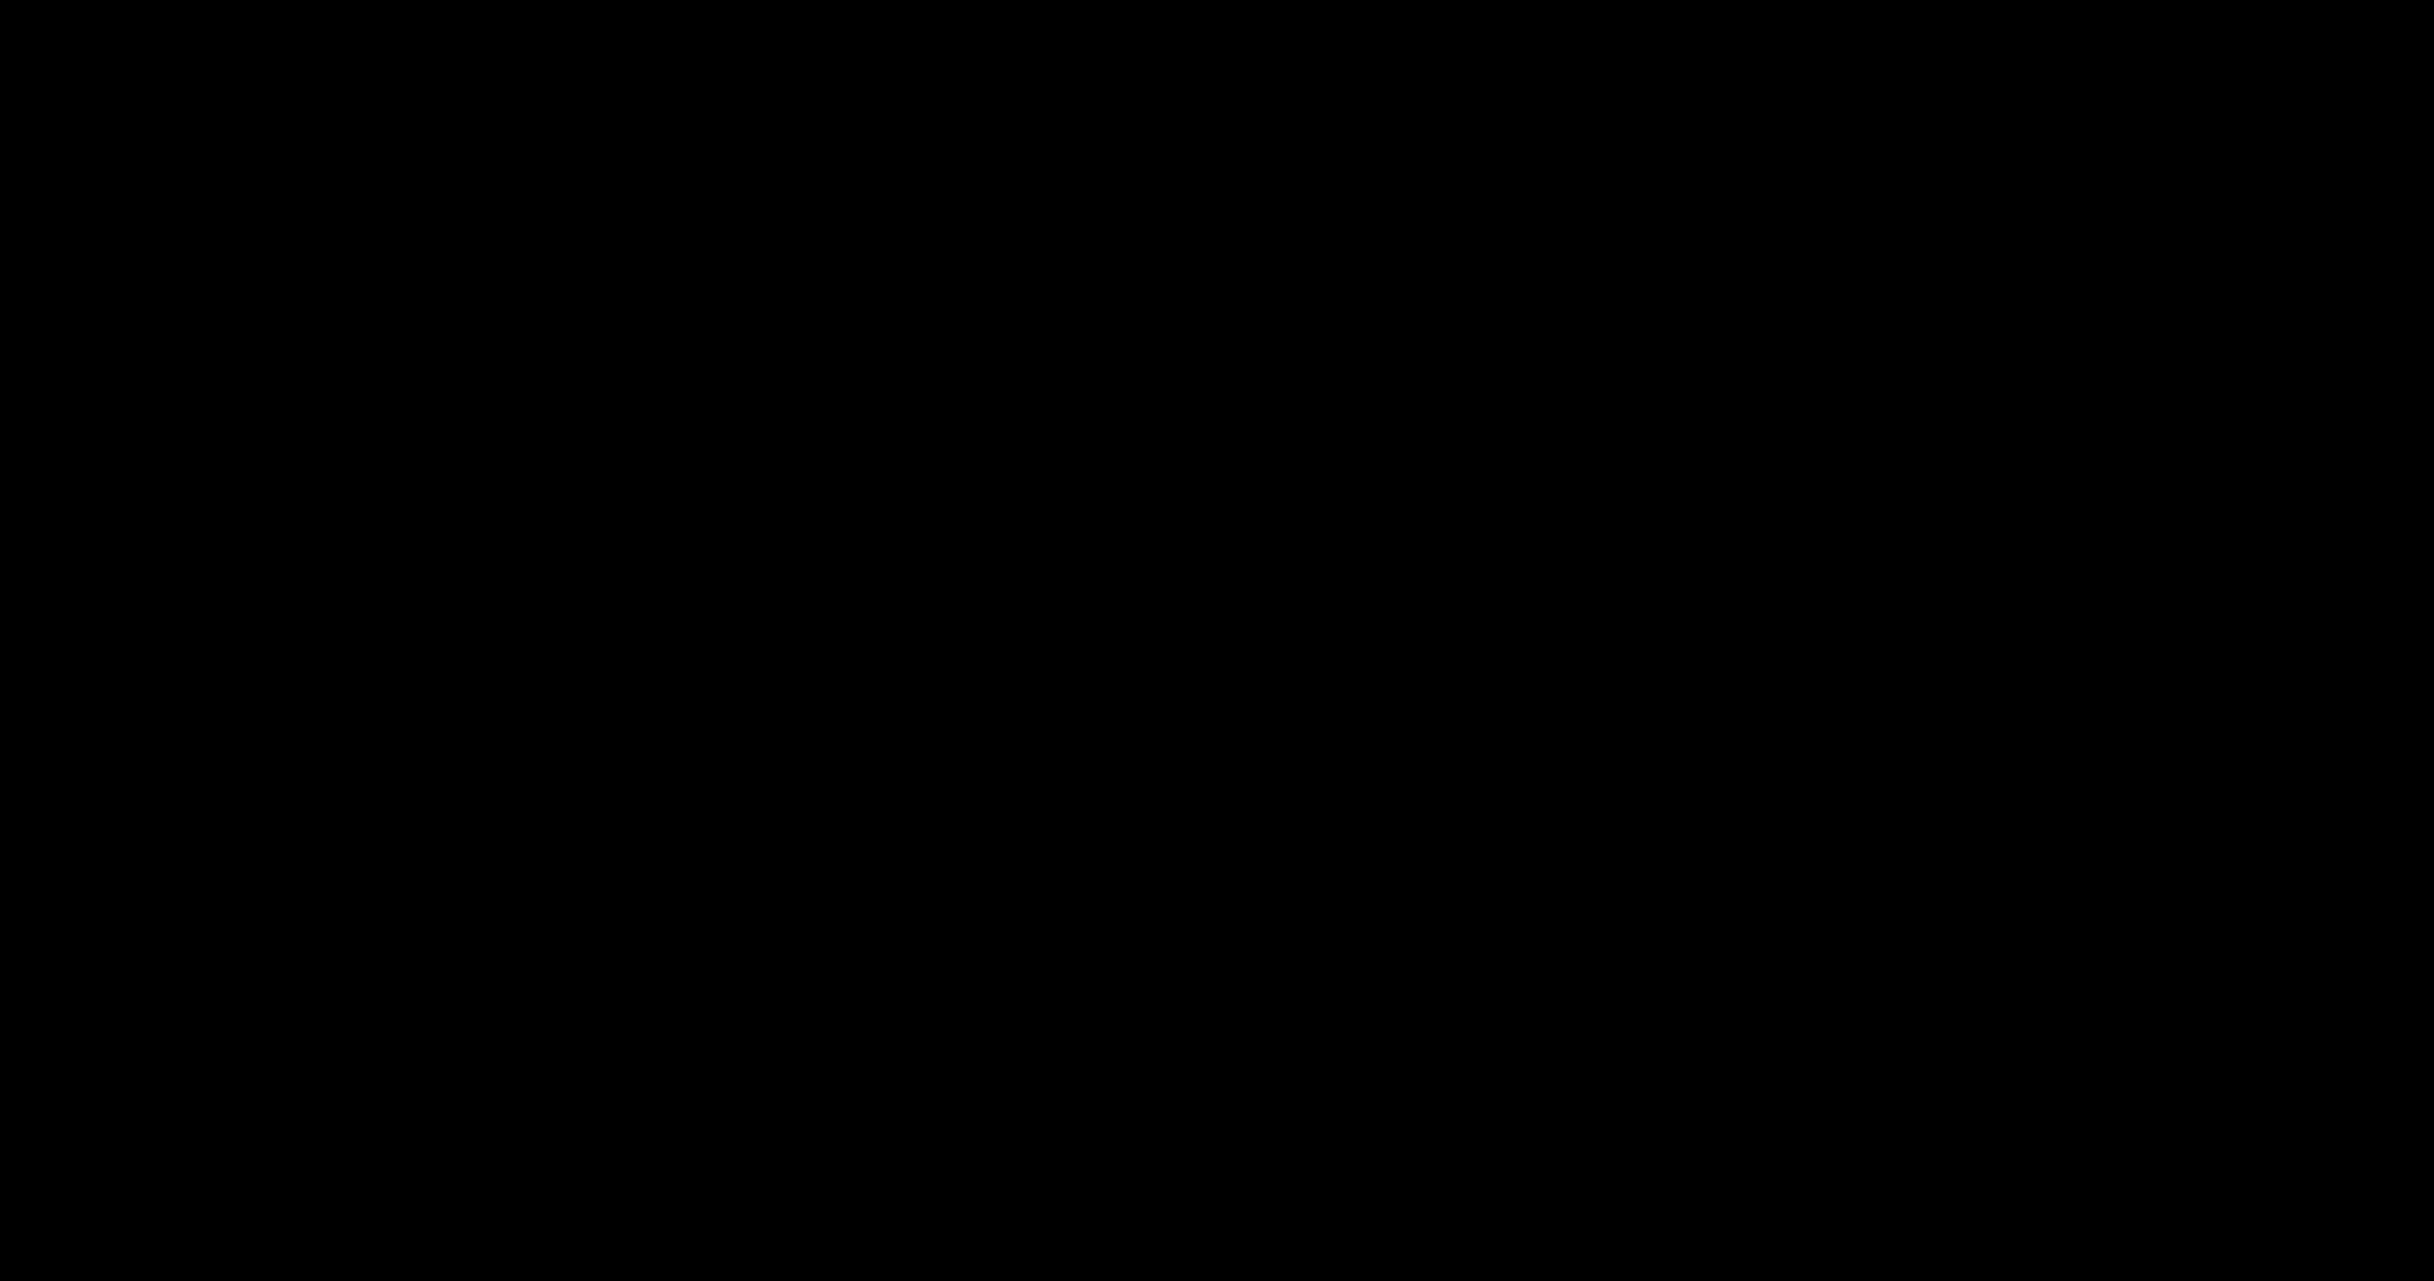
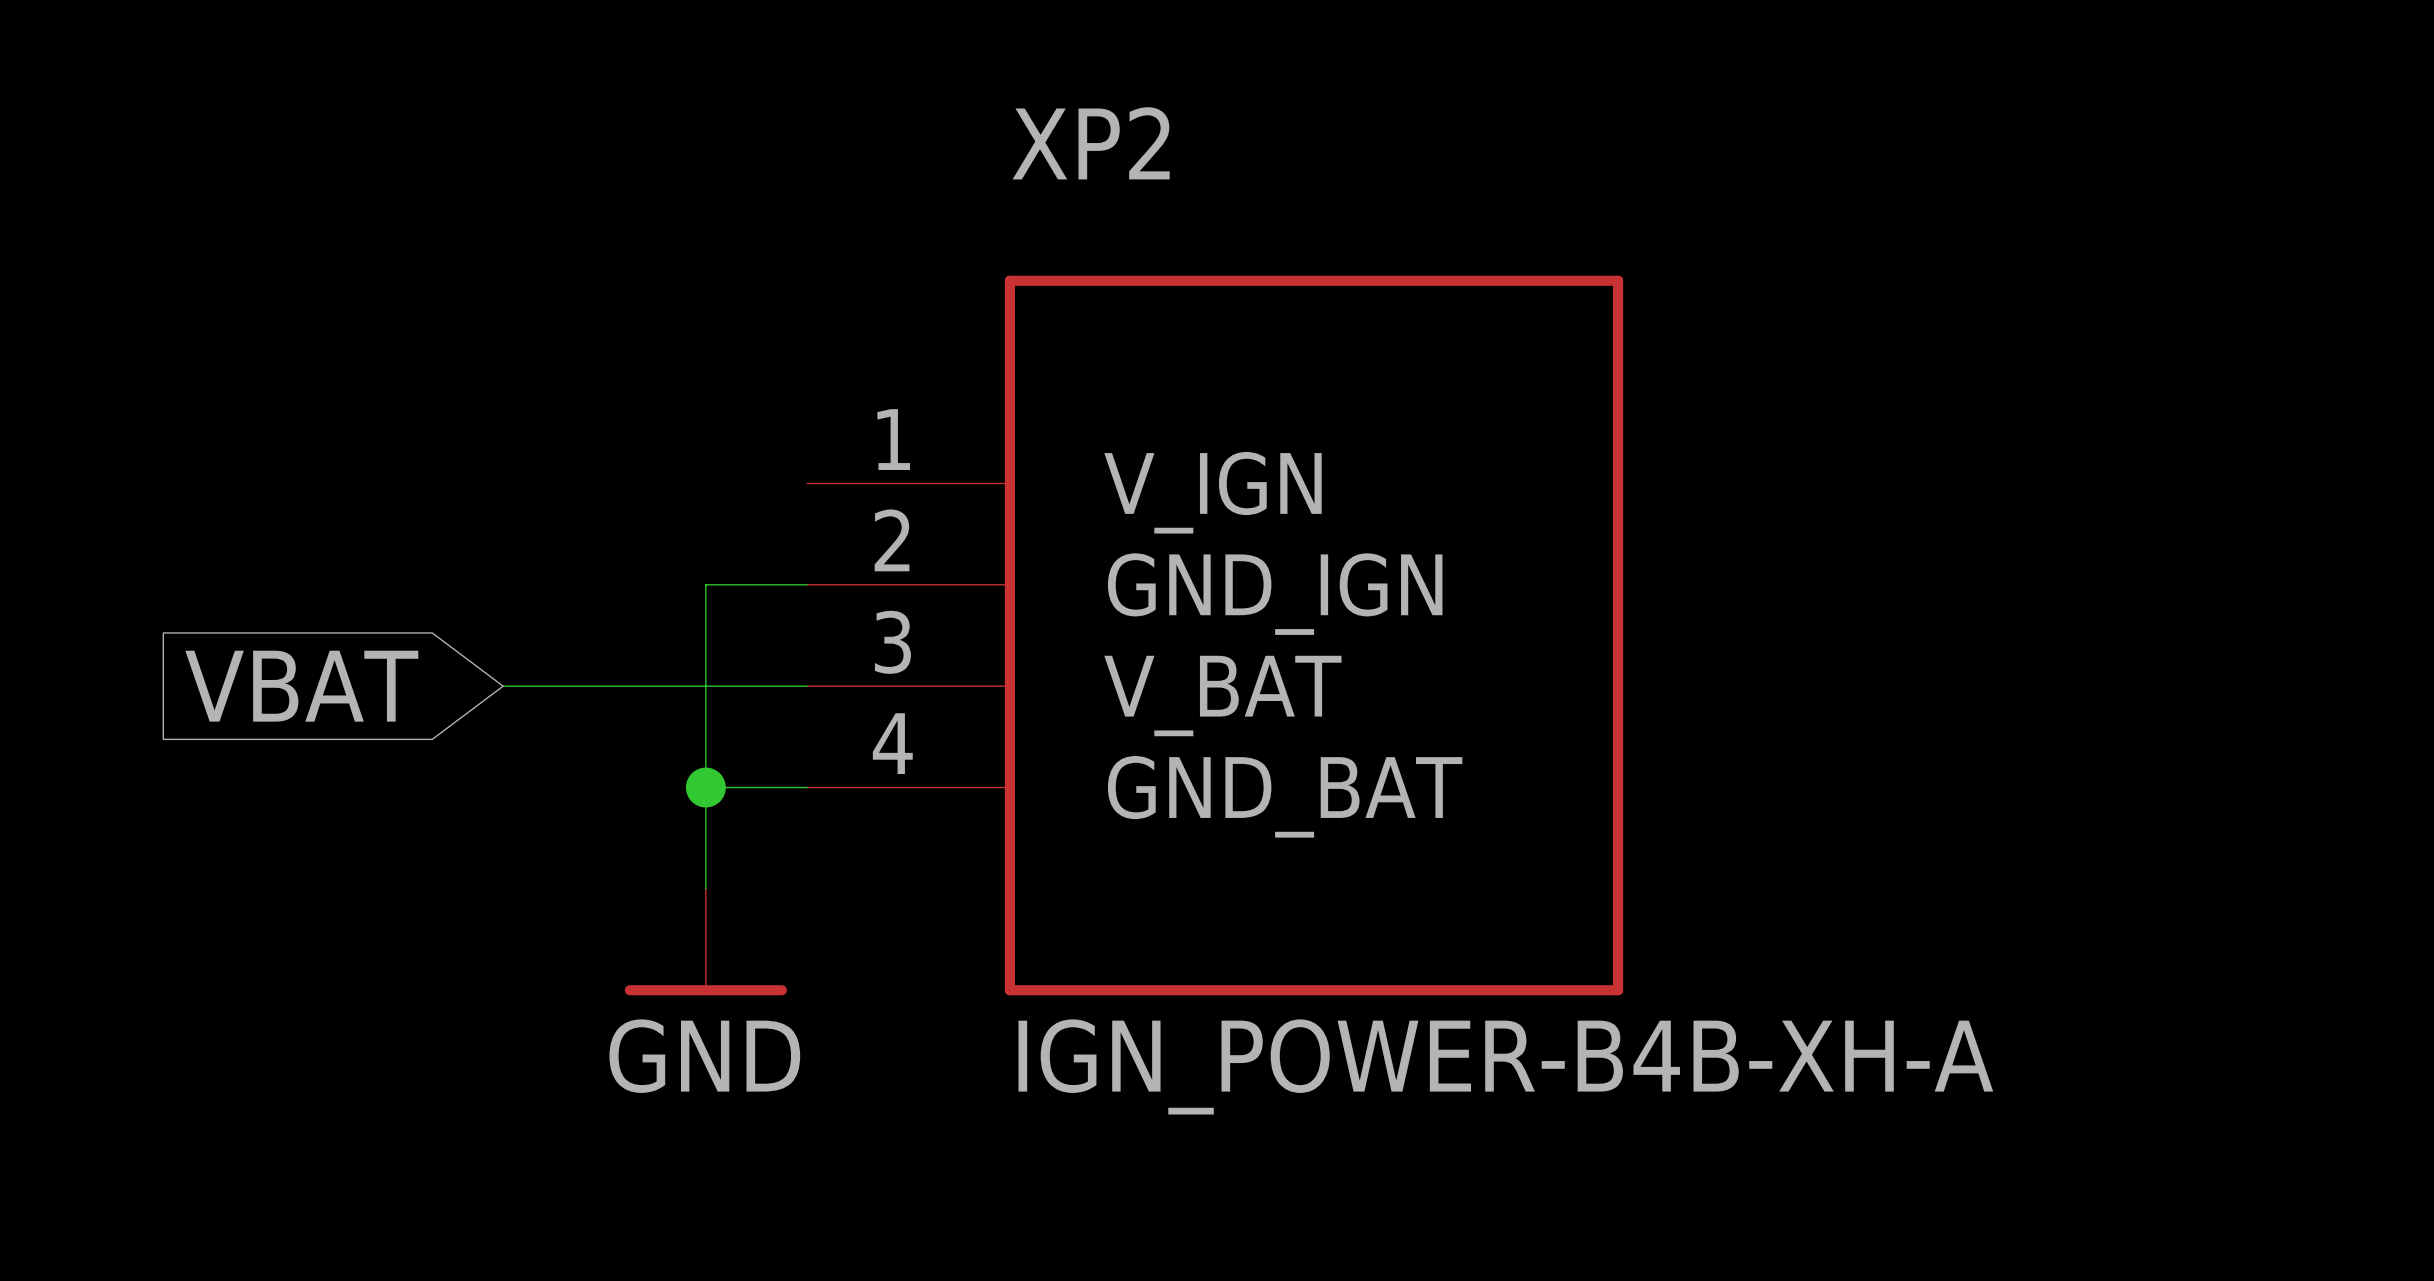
wire: none -> (807, 584) (705, 584) (705, 888)
XP2: none -> IGN_POWER-B4B-XH-A (1215, 635)
global label: none -> VBAT (301, 686)
wire: none -> (503, 686) (807, 686)
wire: none -> (705, 787) (807, 787)
junction: none -> (705, 787)
power symbol: none -> GND (705, 942)

